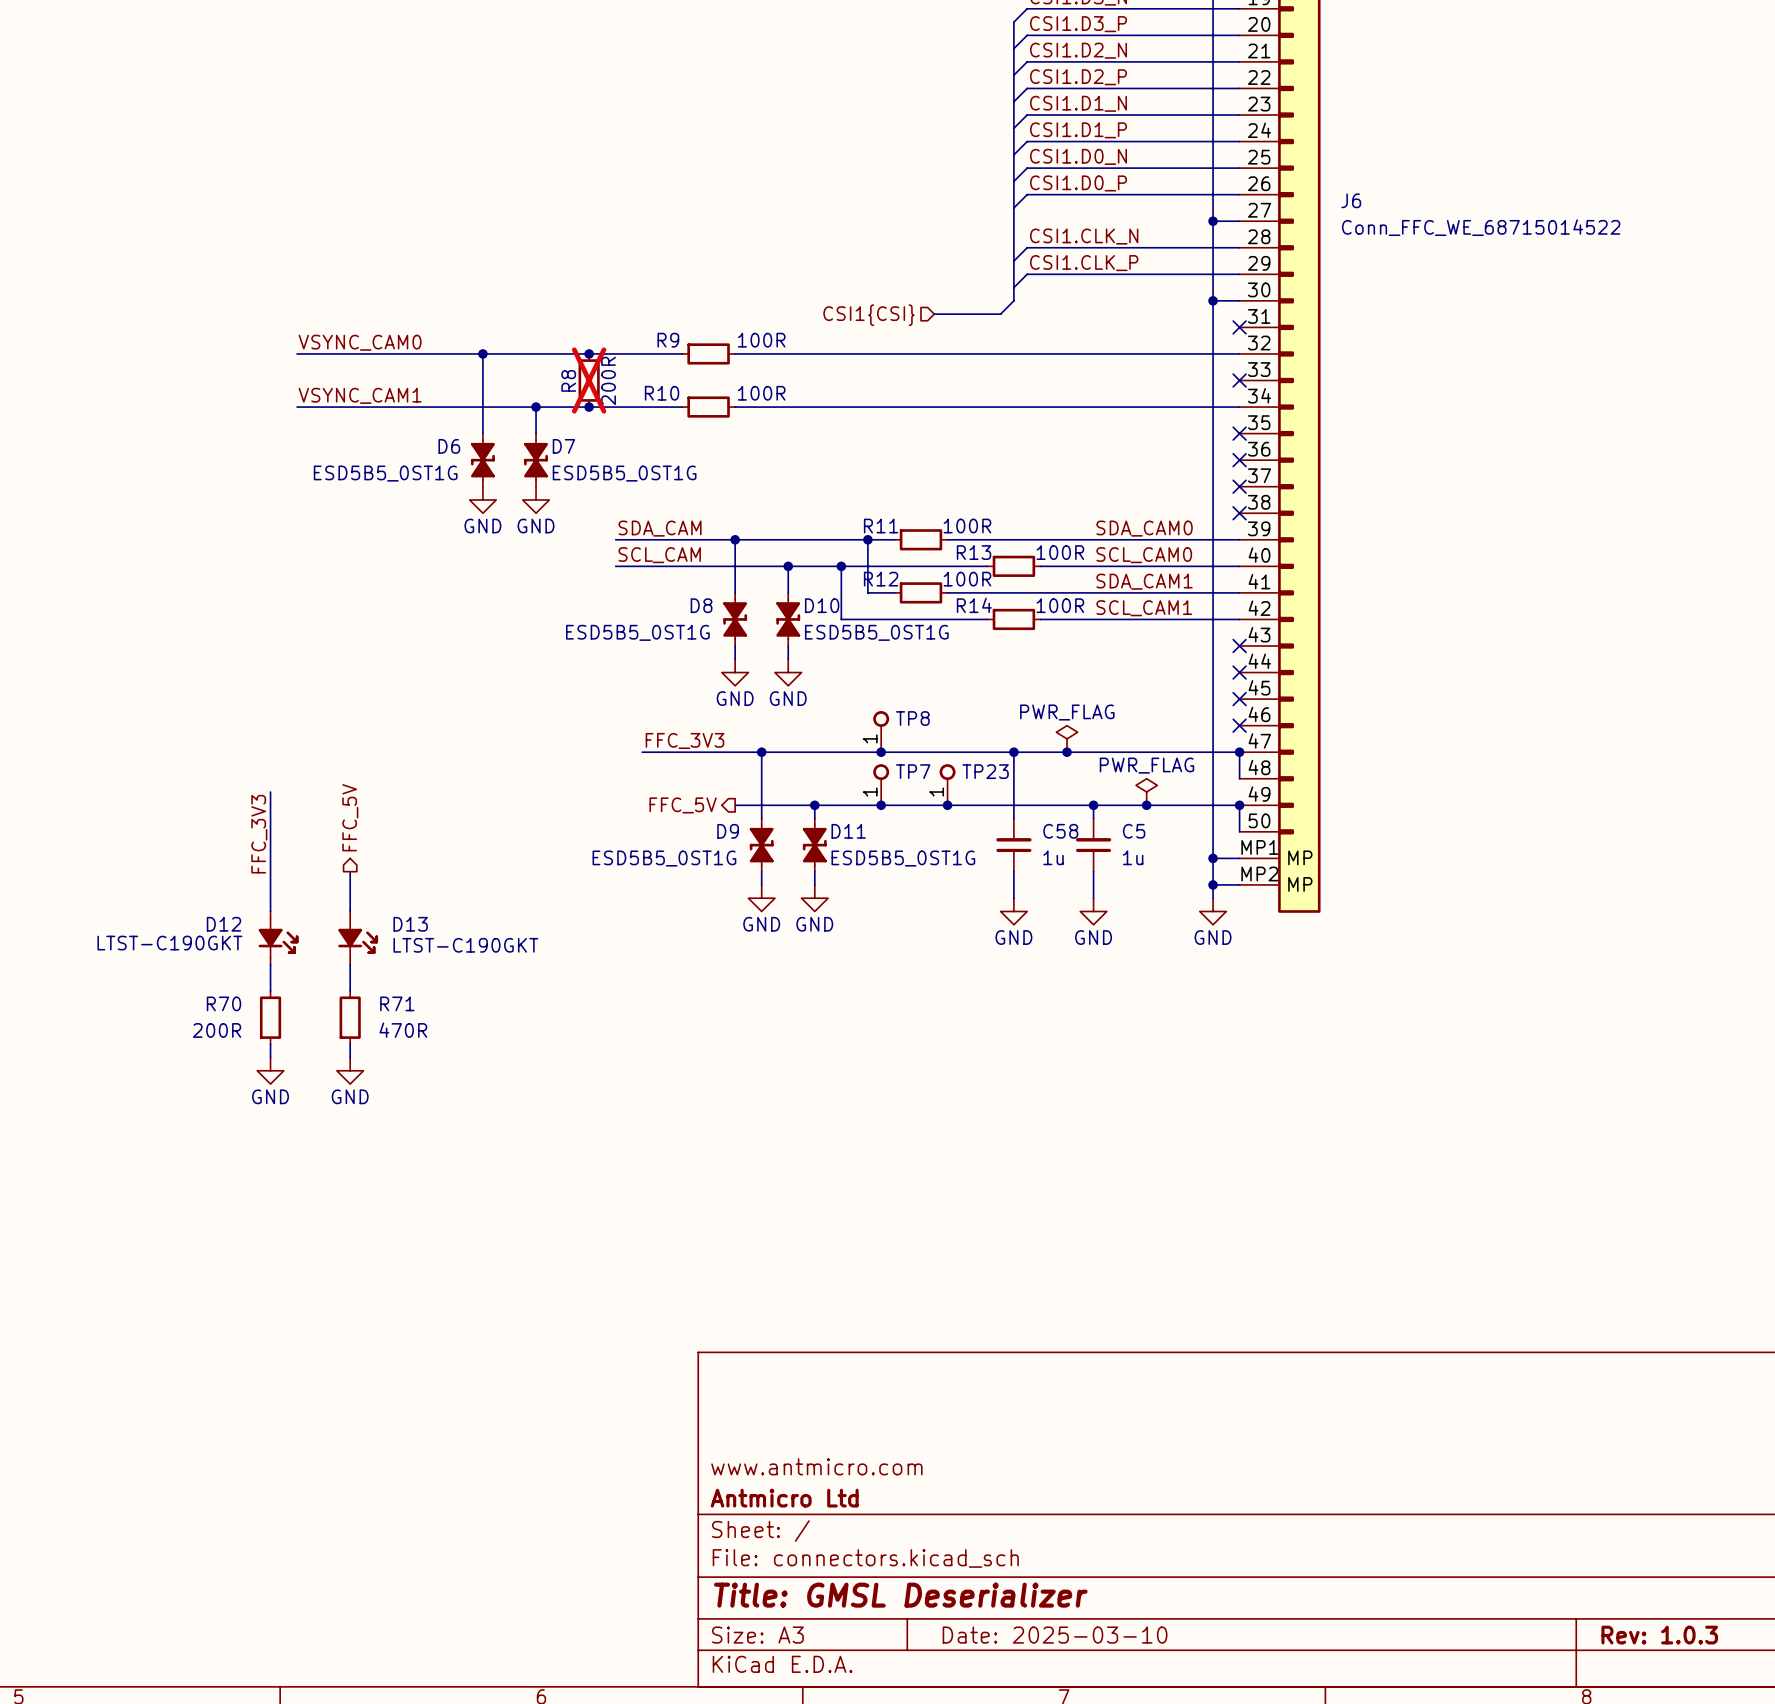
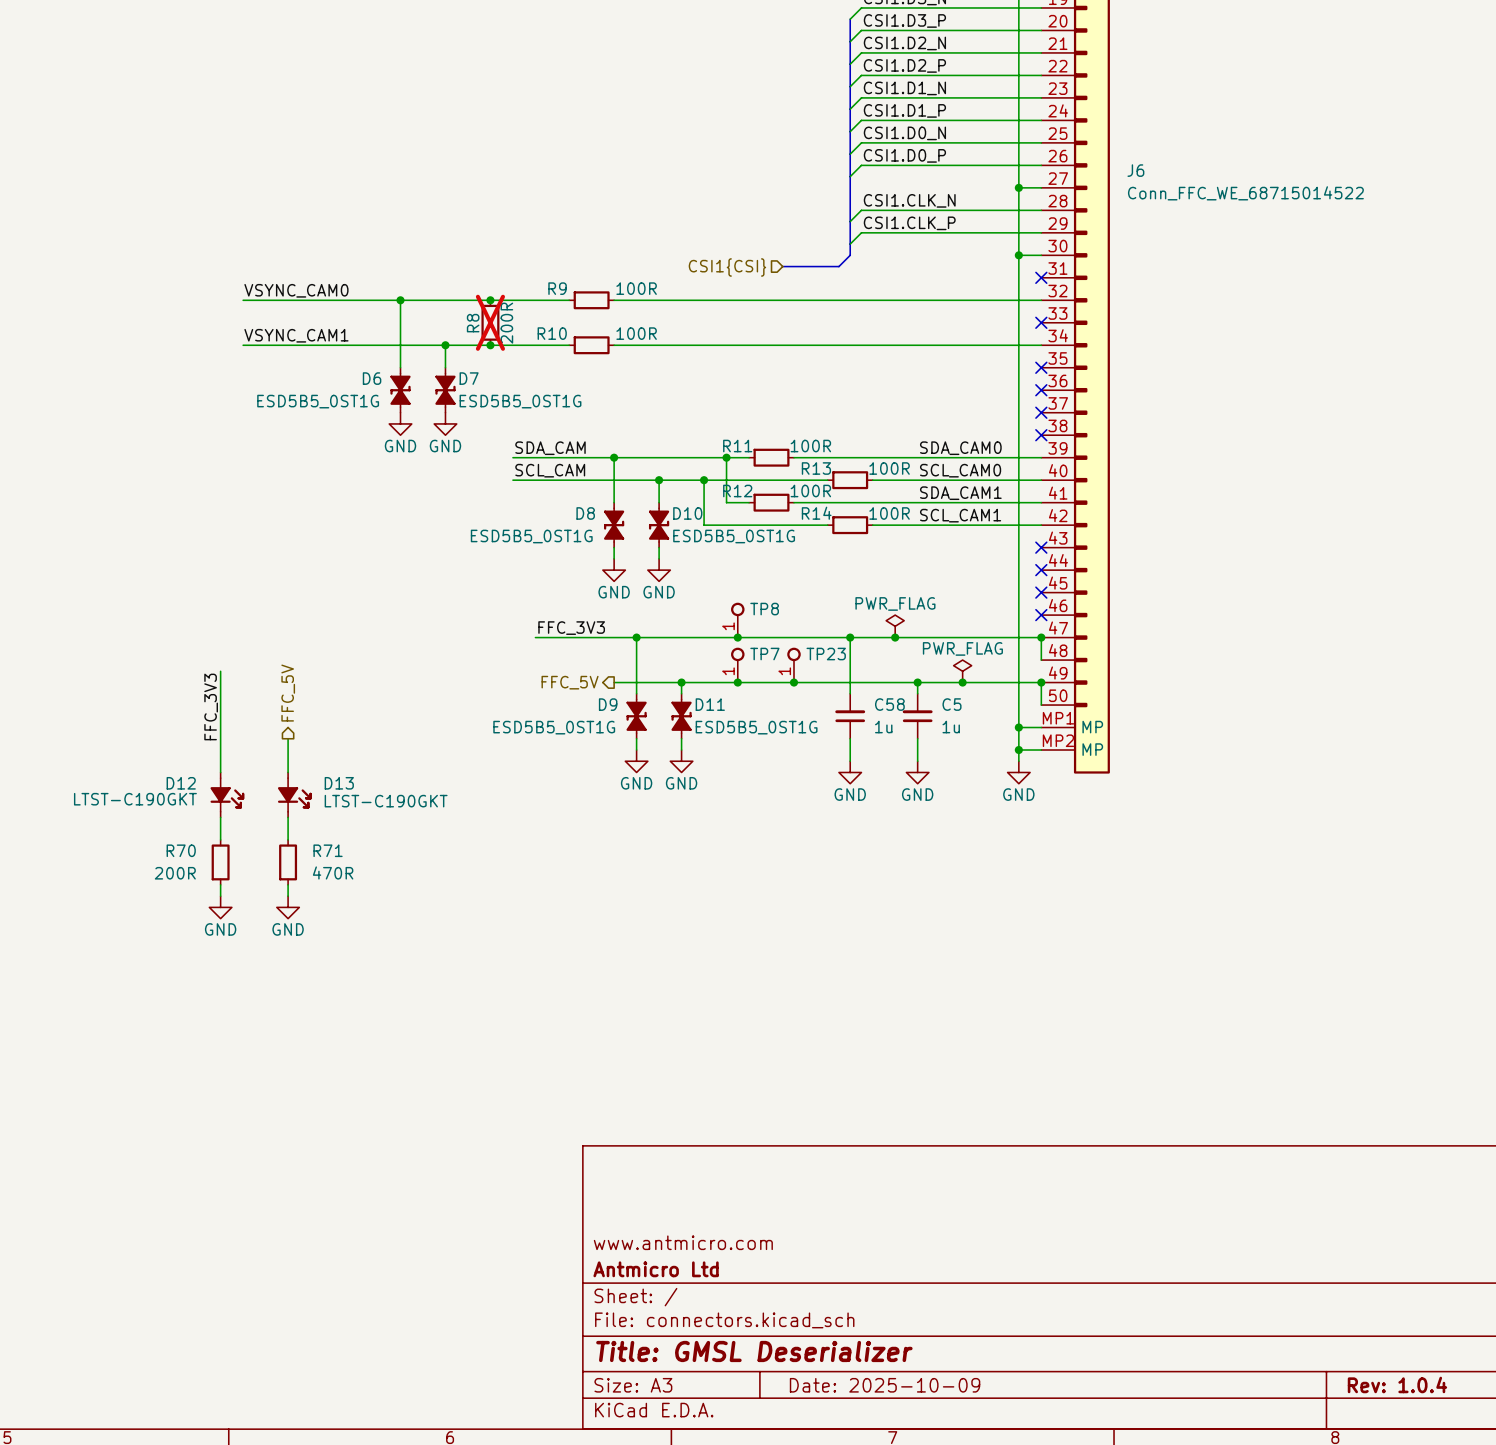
title block: Date: 2025-03-10 (1055, 1635) -> Date: 2025-10-09 (885, 1385)
title block: Rev: 1.0.3 (1659, 1635) -> Rev: 1.0.4 (1397, 1384)

